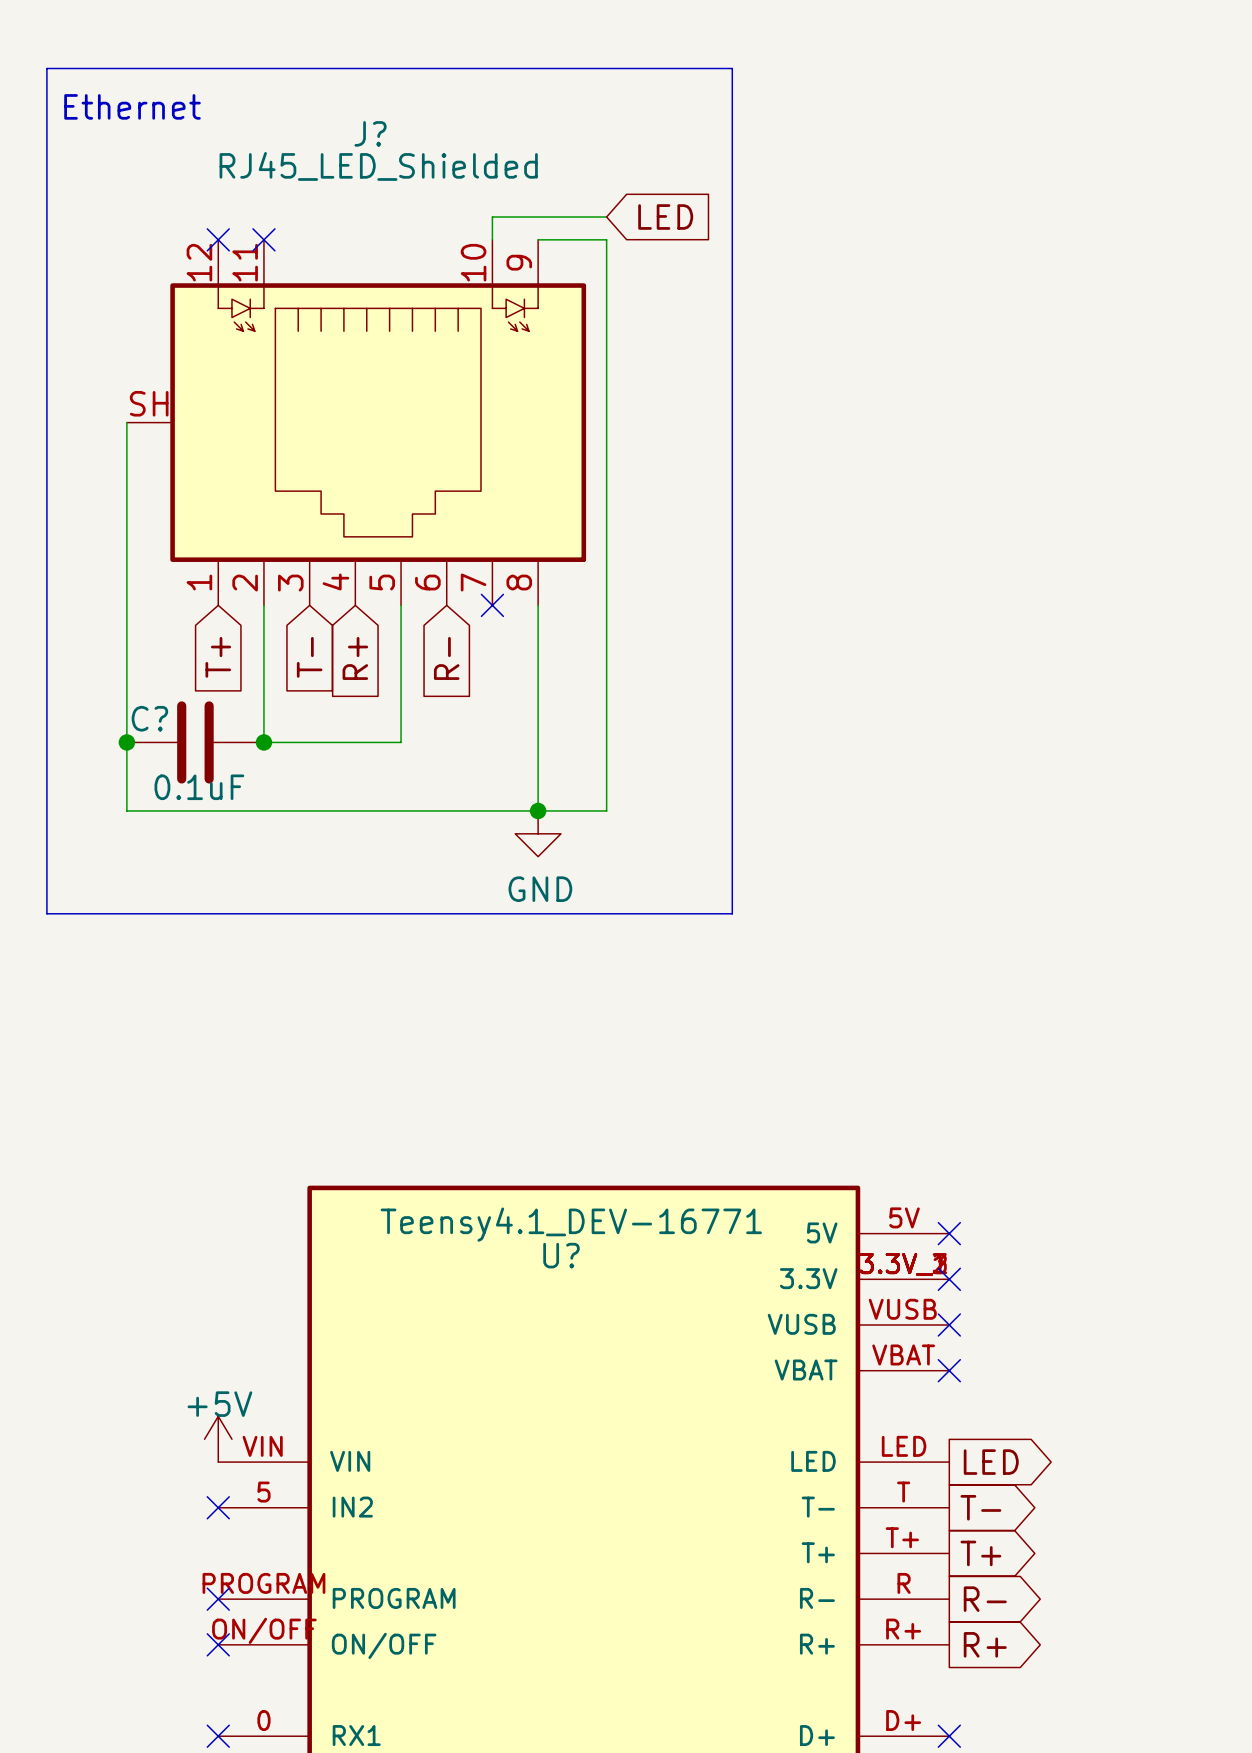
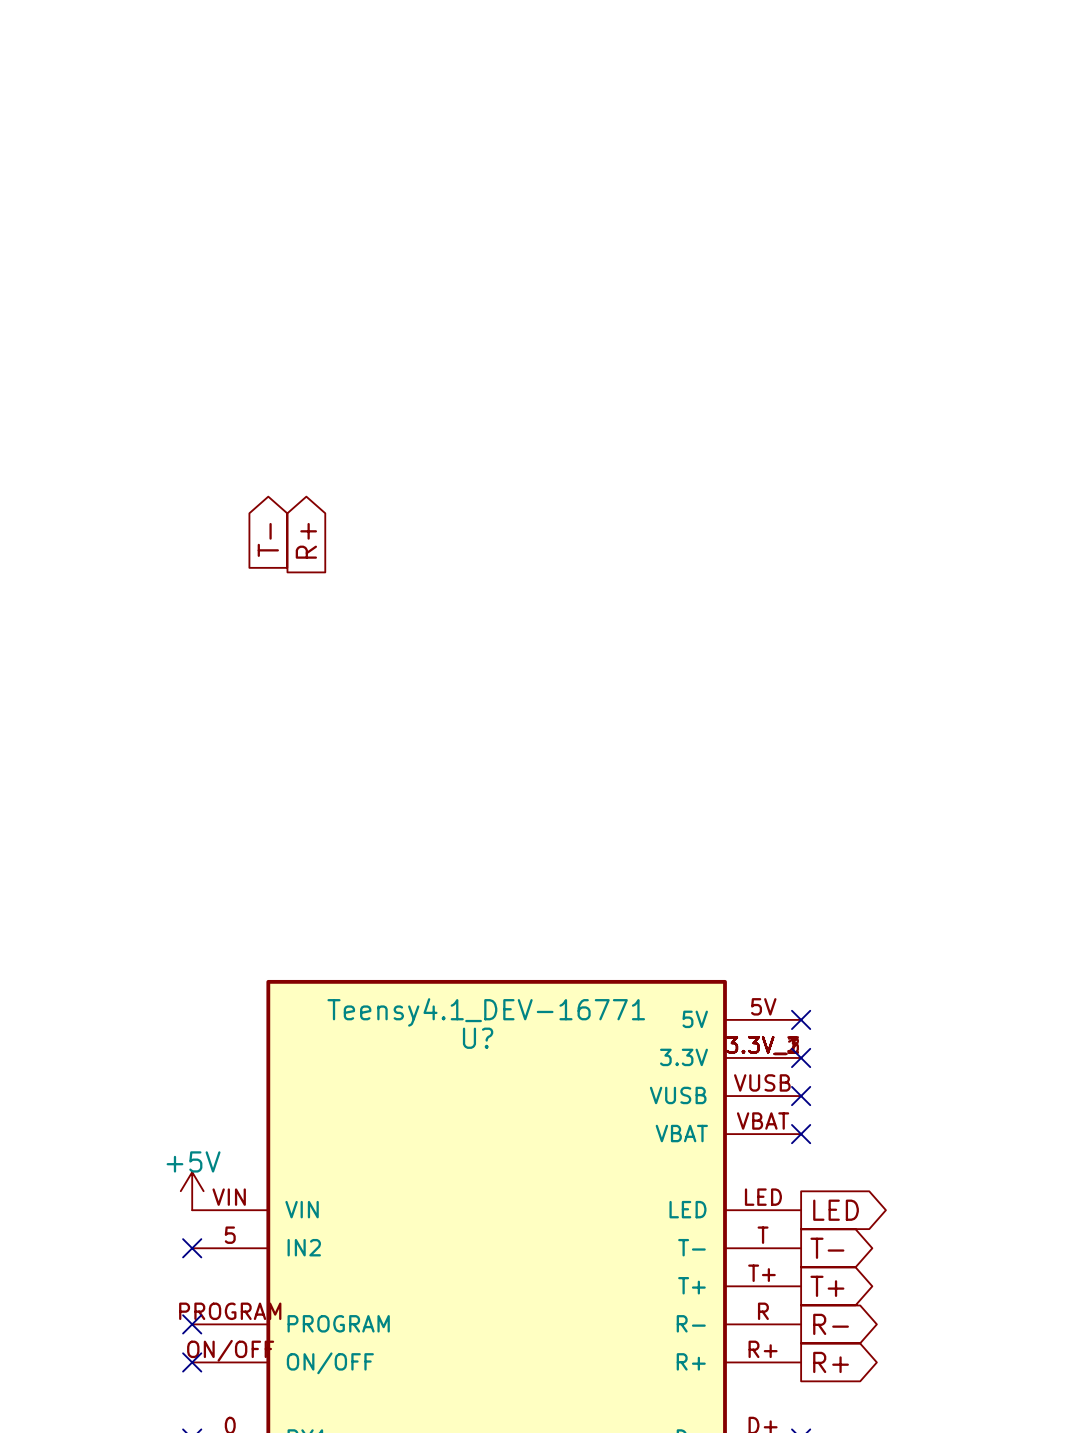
line: (46, 68) (46, 913) (732, 913) (732, 68) (46, 68) -> none
text: Ethernet (132, 106) -> none
wire: (606, 217) (492, 217) (492, 239) -> none
global label: LED (665, 217) -> none
no-connect mark: (218, 239) -> none
no-connect mark: (263, 239) -> none
wire: (538, 239) (606, 239) (606, 810) (126, 810) (126, 422) -> none
J?: RJ45_LED_Shielded (356, 422) -> none
wire: (263, 605) (263, 742) (401, 742) (401, 605) -> none
no-connect mark: (492, 605) -> none
wire: (538, 605) (538, 810) -> none
global label: T+ (218, 657) -> none
global label: R- (446, 658) -> none
junction: (126, 742) -> none
C?: 0.1uF (195, 742) -> none
junction: (263, 742) -> none
junction: (538, 810) -> none
power symbol: GND (538, 833) -> none

